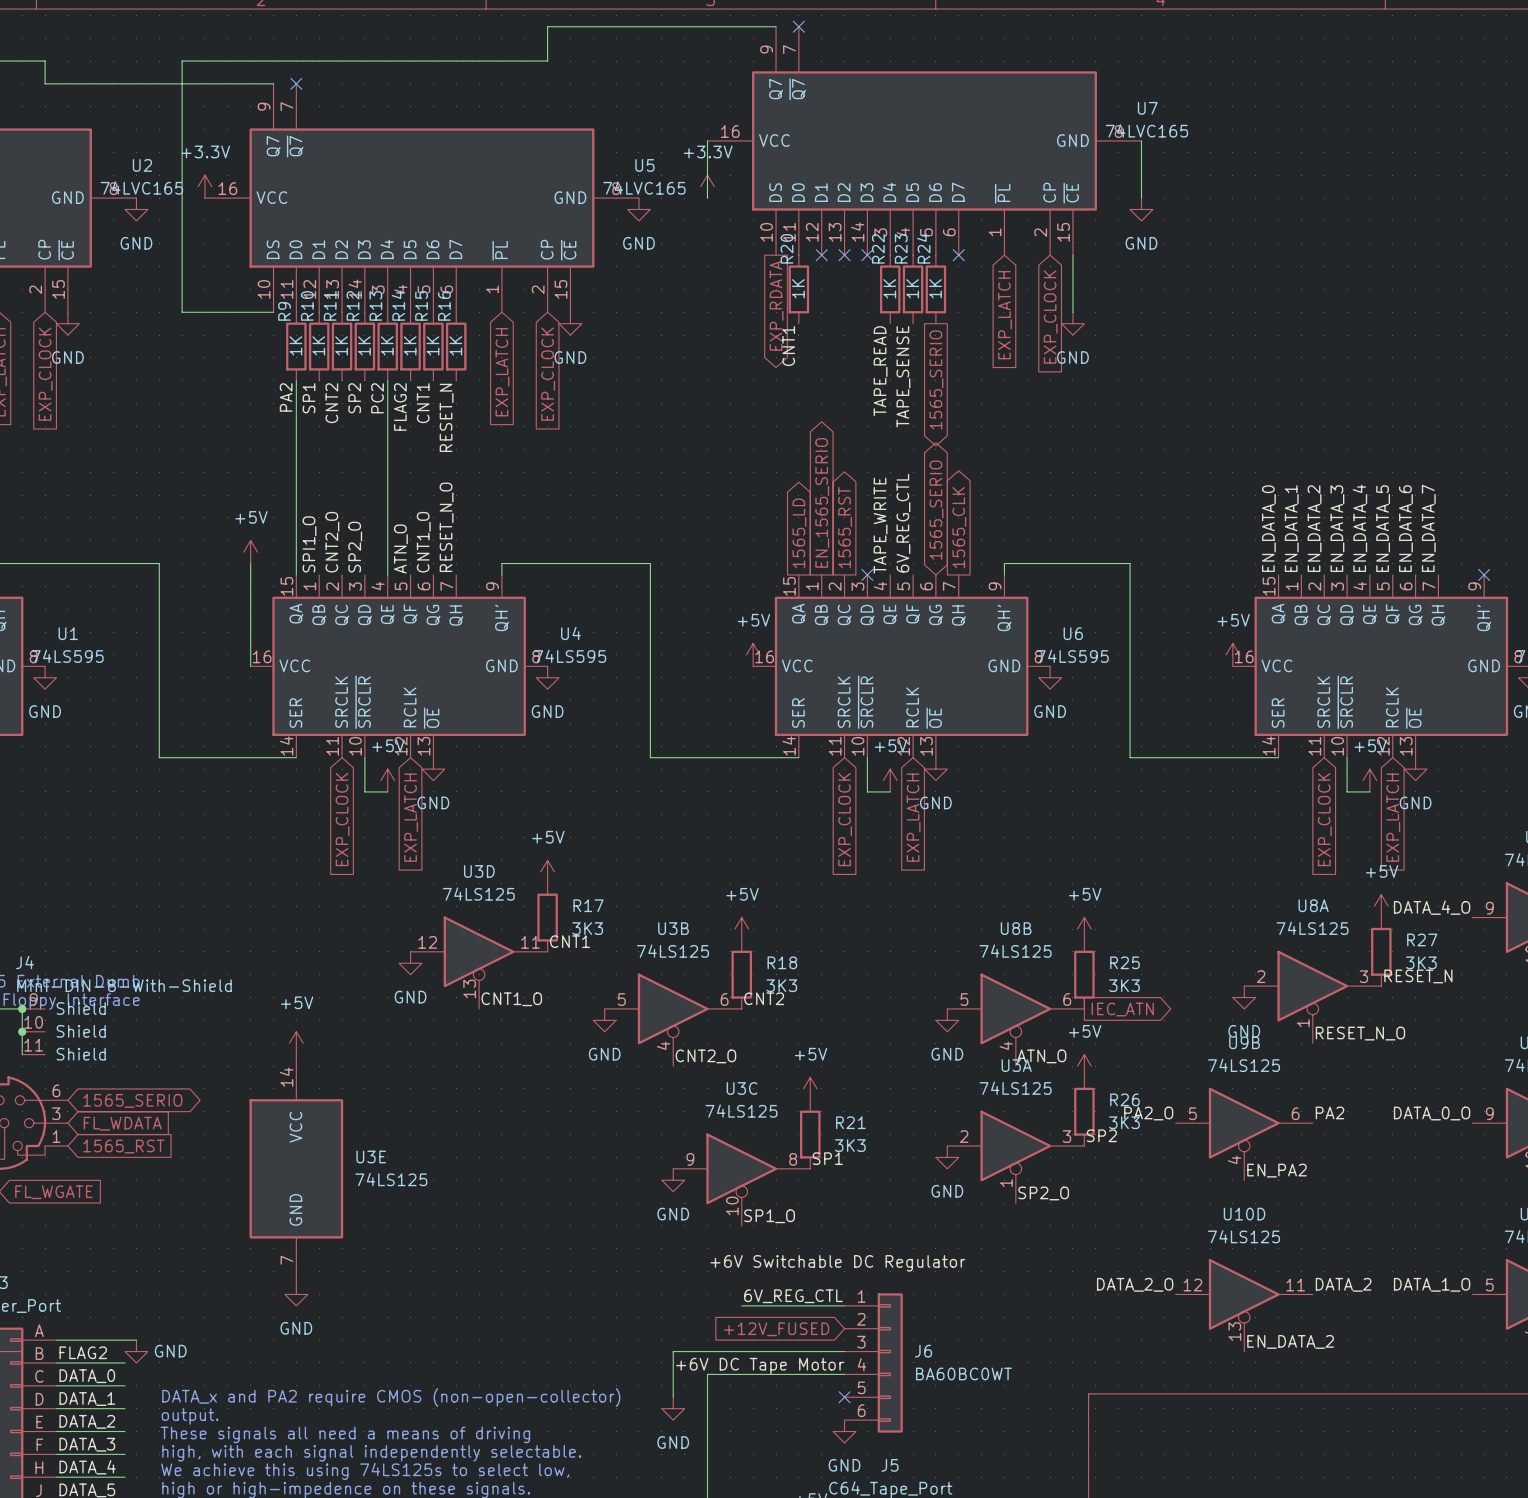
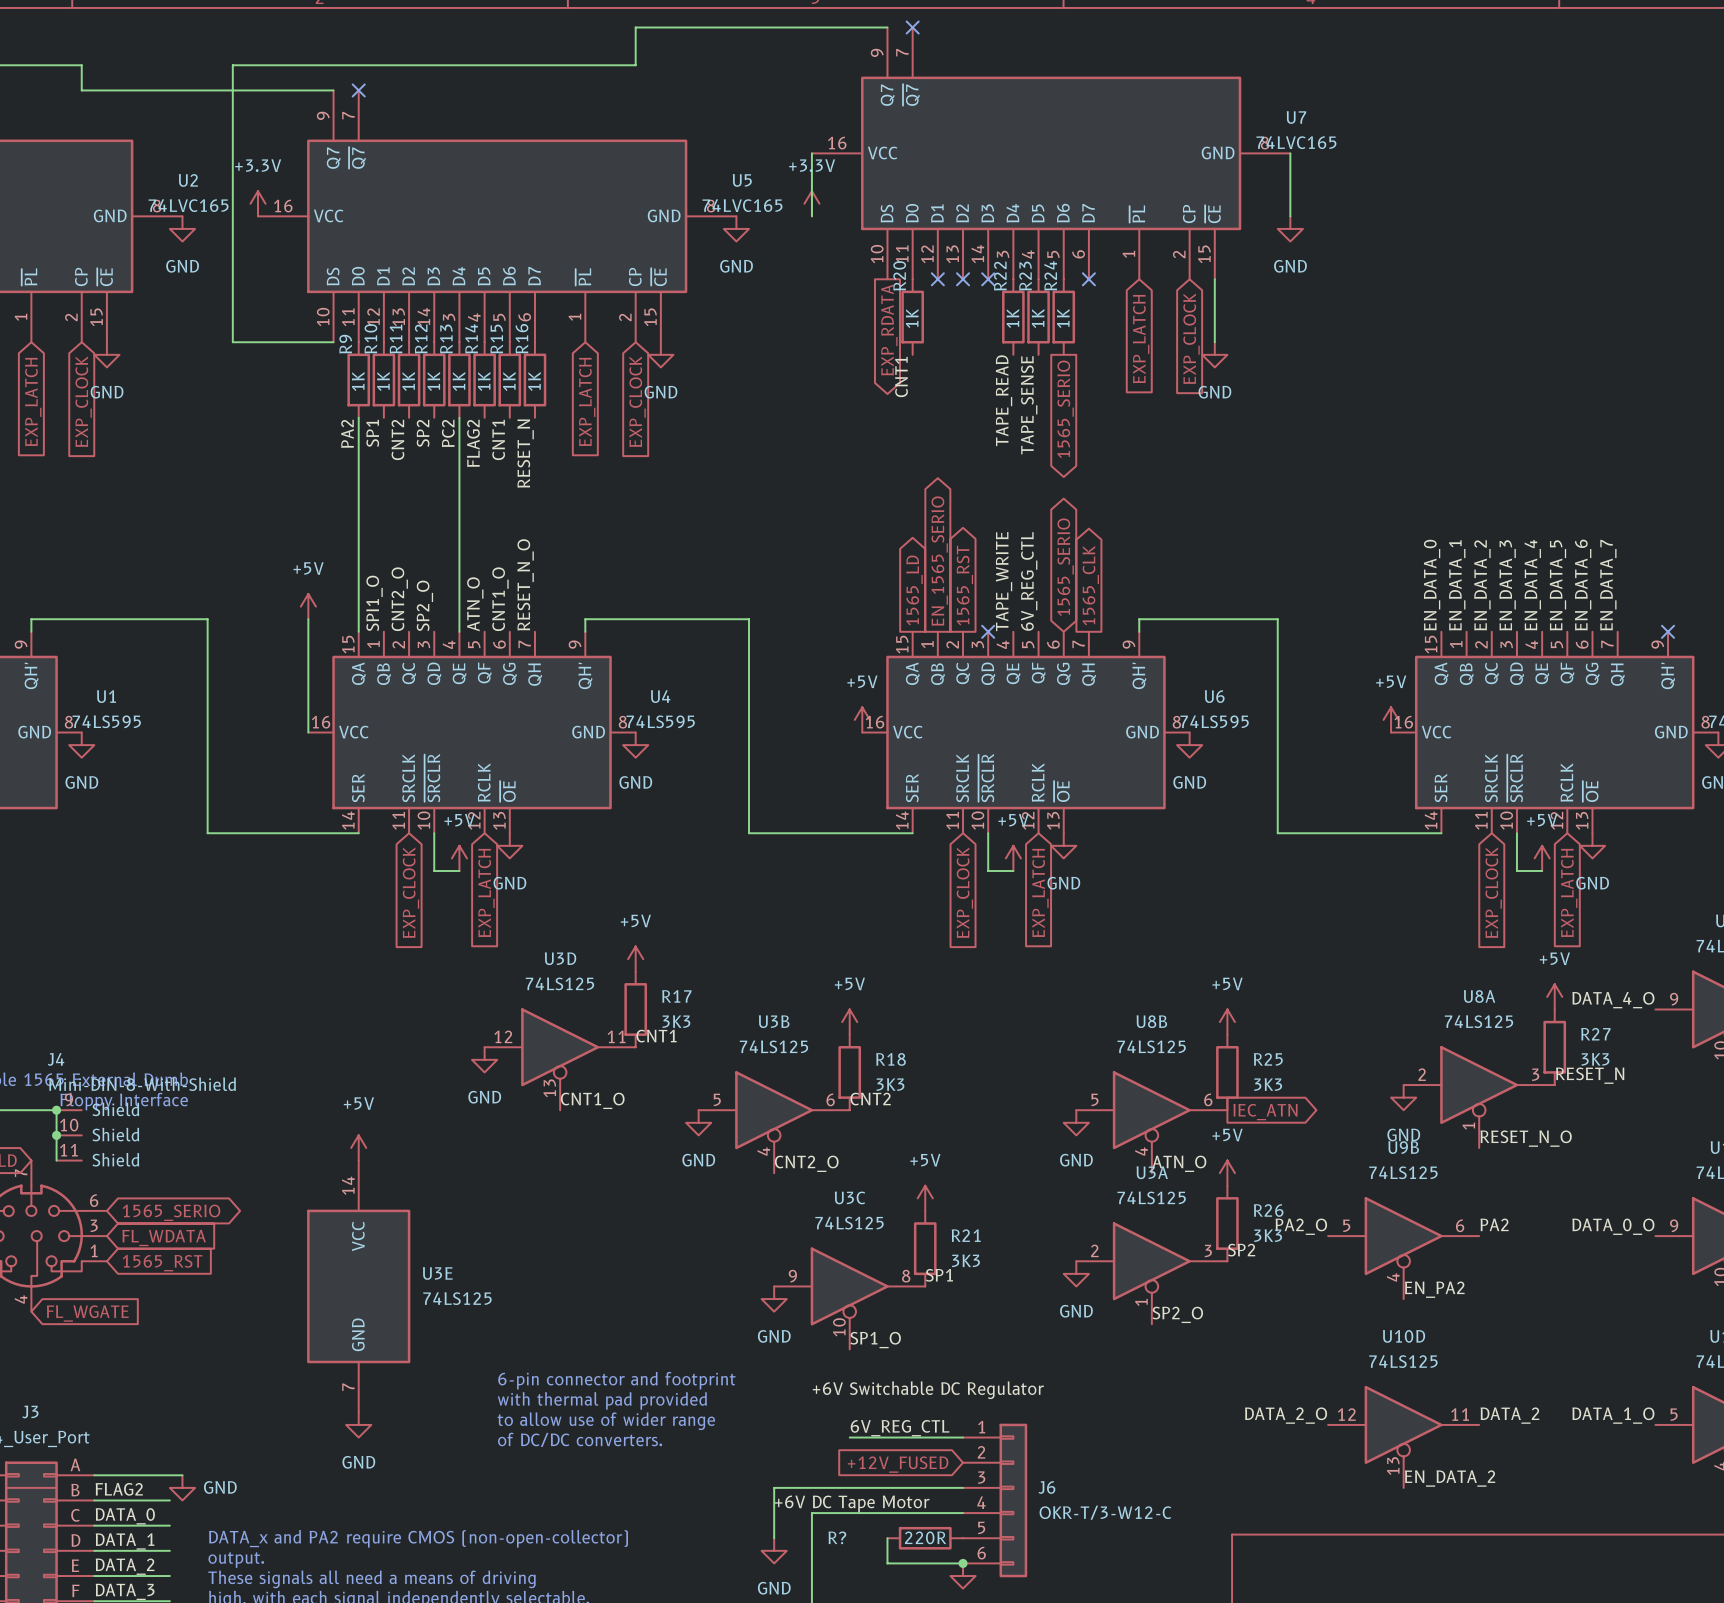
text: none -> 6-pin connector and footprint (616, 1380)
text: none -> with thermal pad provided (602, 1400)
text: none -> to allow use of wider range (606, 1421)
text: none -> of DC/DC converters. (580, 1439)
J6 value: BA60BC0WT (964, 1373) -> OKR-T/3-W12-C (1105, 1512)
wire: none -> (887, 1538) (887, 1563) (963, 1563)
R?: none -> 220R (925, 1538)
no-connect mark: (844, 1397) -> none
junction: none -> (963, 1563)

